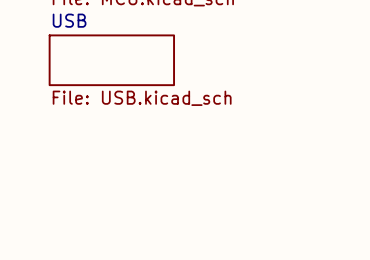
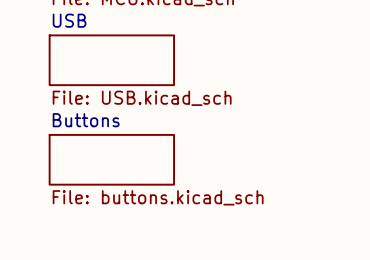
sheet Buttons: none -> File: buttons.kicad_sch (111, 159)

